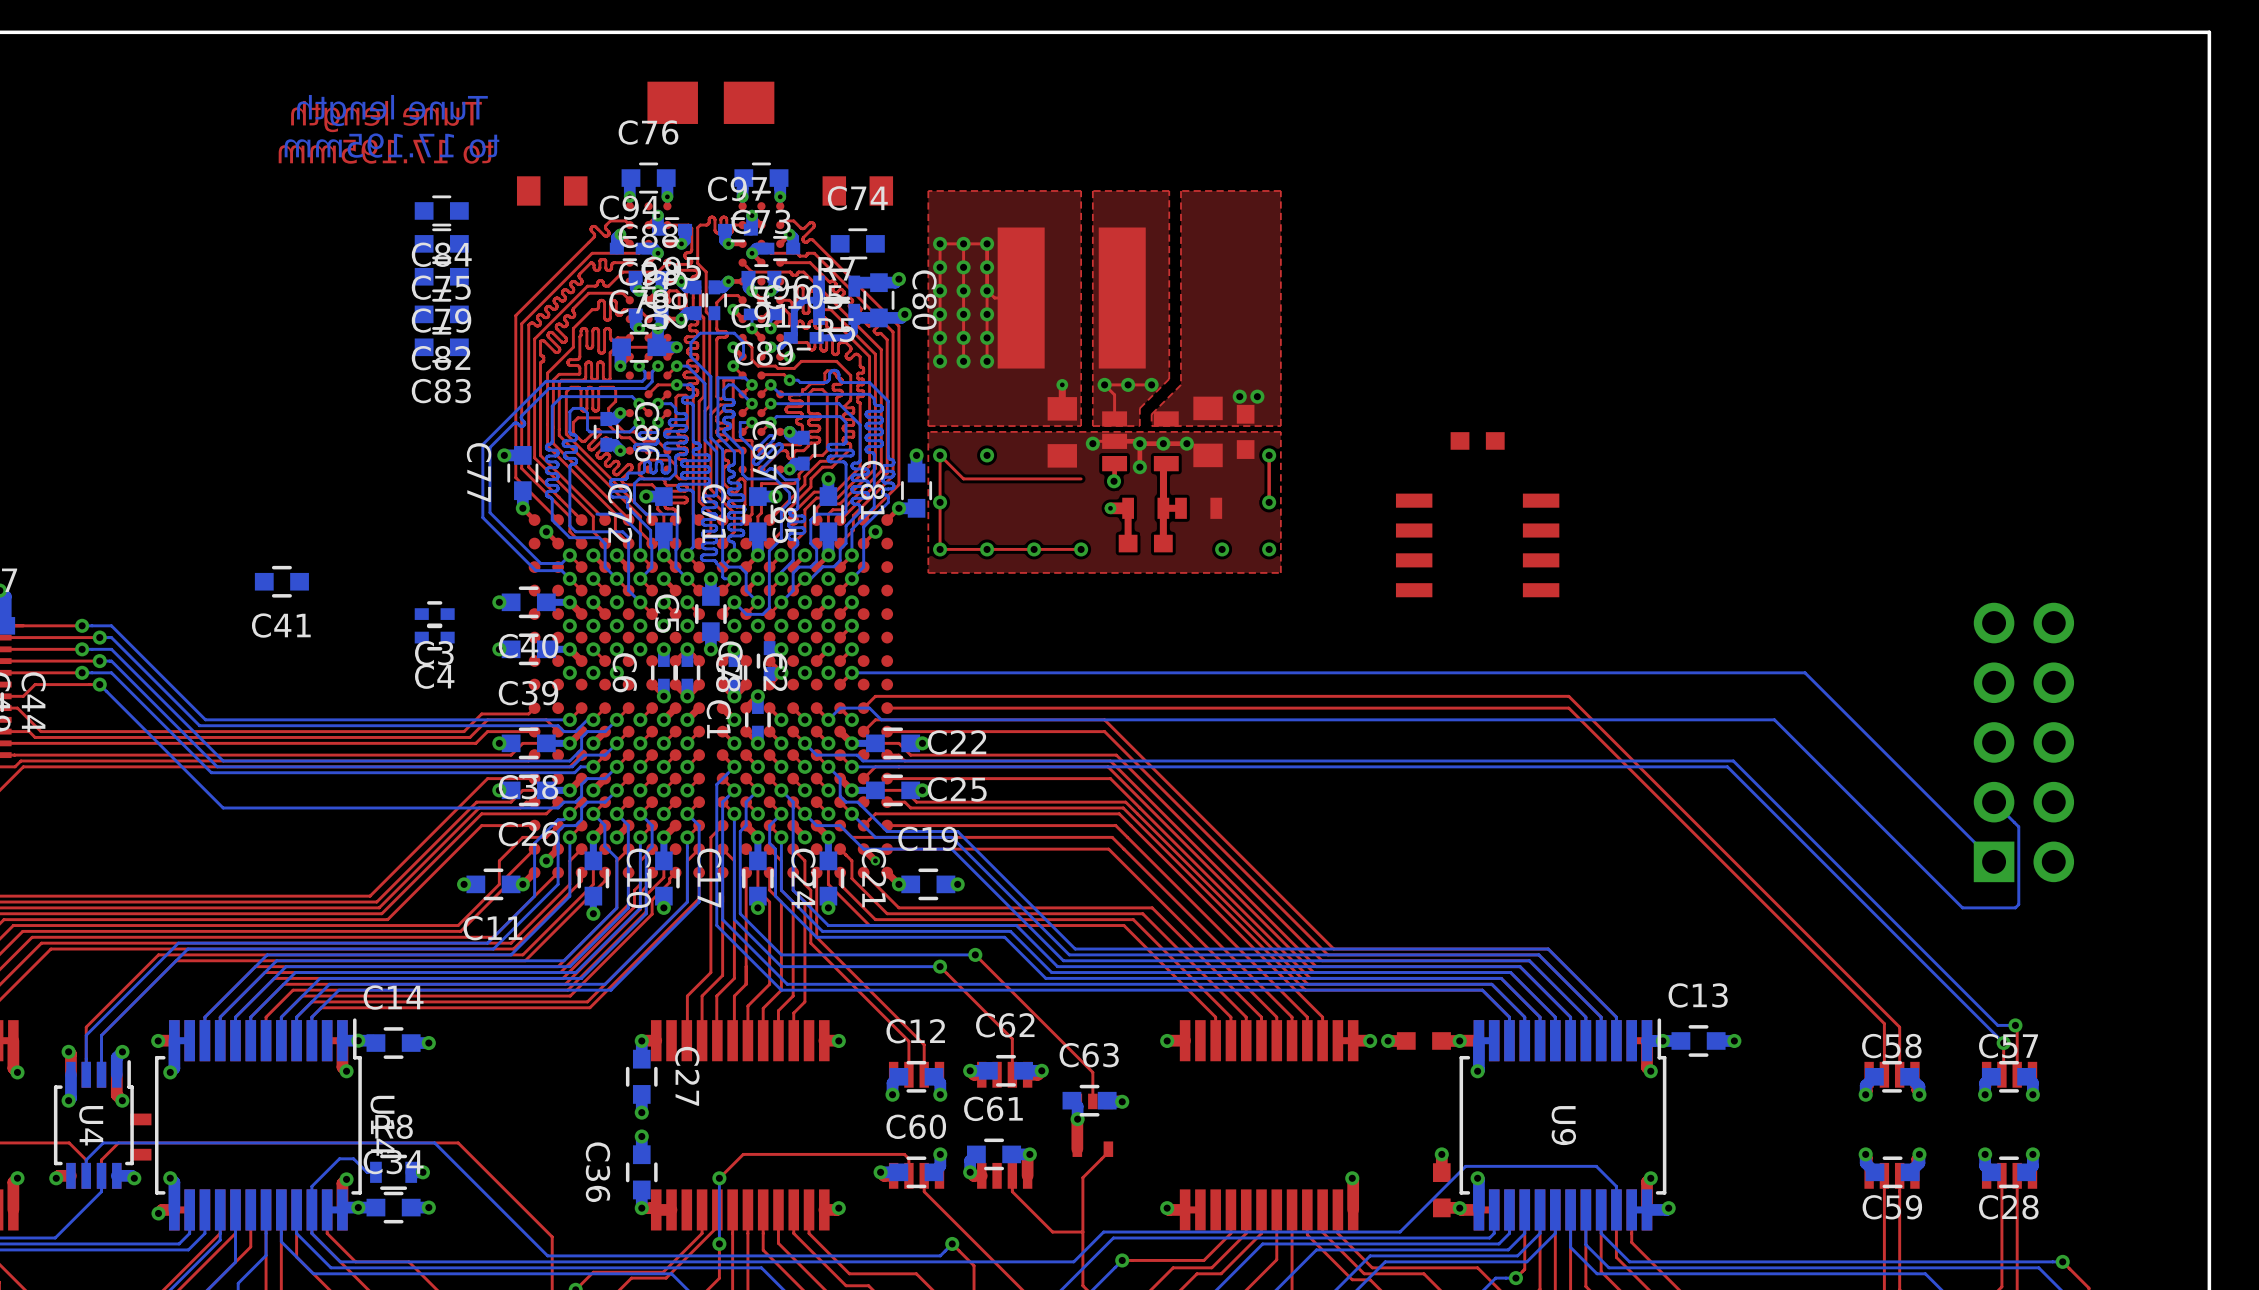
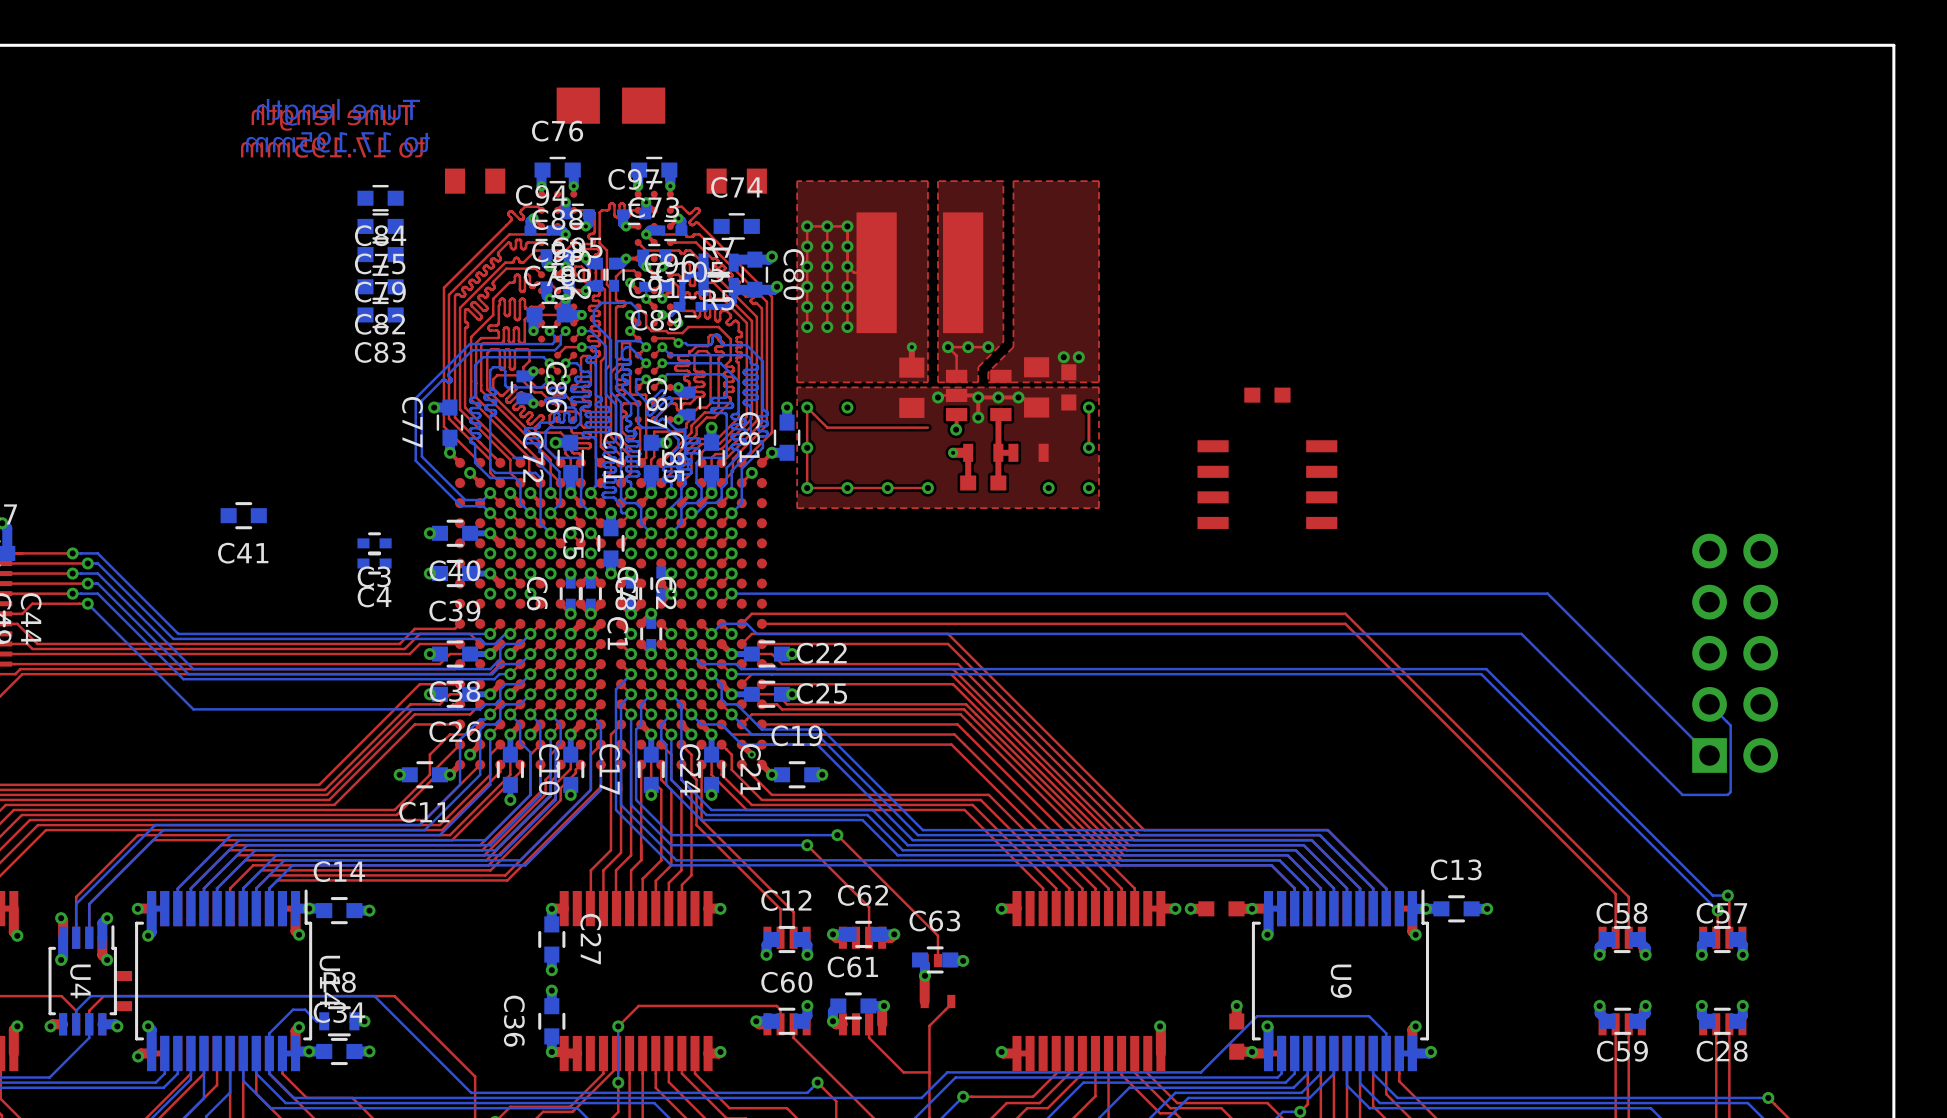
bottom track: (797, 479) (785, 479) -> (688, 469) (688, 459) (684, 454) (697, 453) (699, 450) (697, 448) (685, 448) (684, 444) (697, 443) (699, 440) (697, 438) (685, 437) (684, 429) (674, 428)
bottom track: (781, 515) (781, 538) (769, 550) (769, 607) (762, 614) (746, 614) (734, 602) -> (671, 458) (682, 463) (680, 466) (663, 467) (665, 471) (680, 471) (682, 473) (680, 476) (663, 477) (664, 480) (671, 482) (671, 493)

